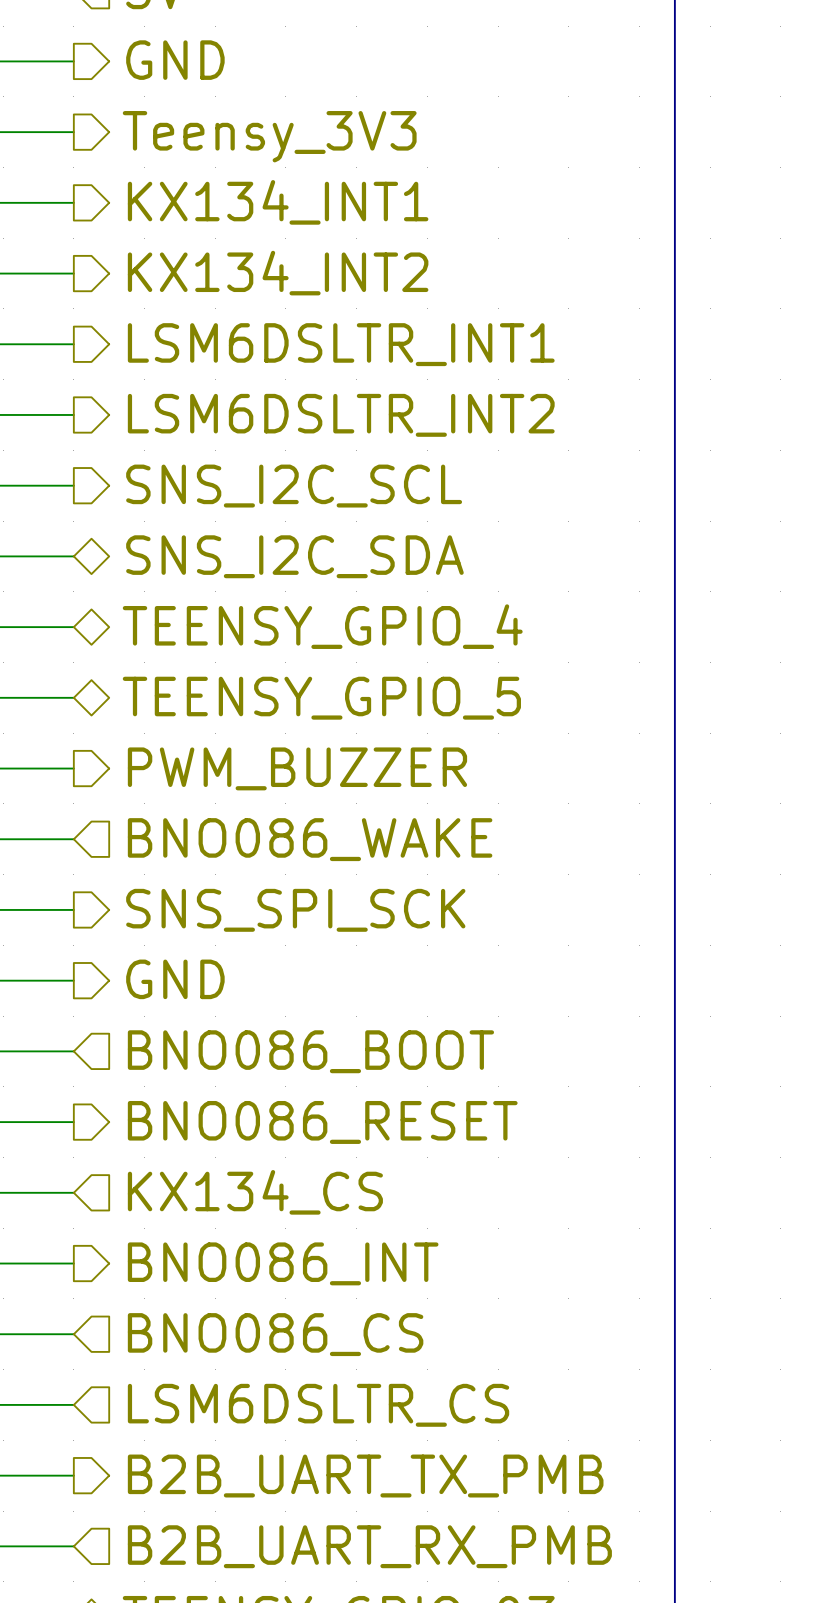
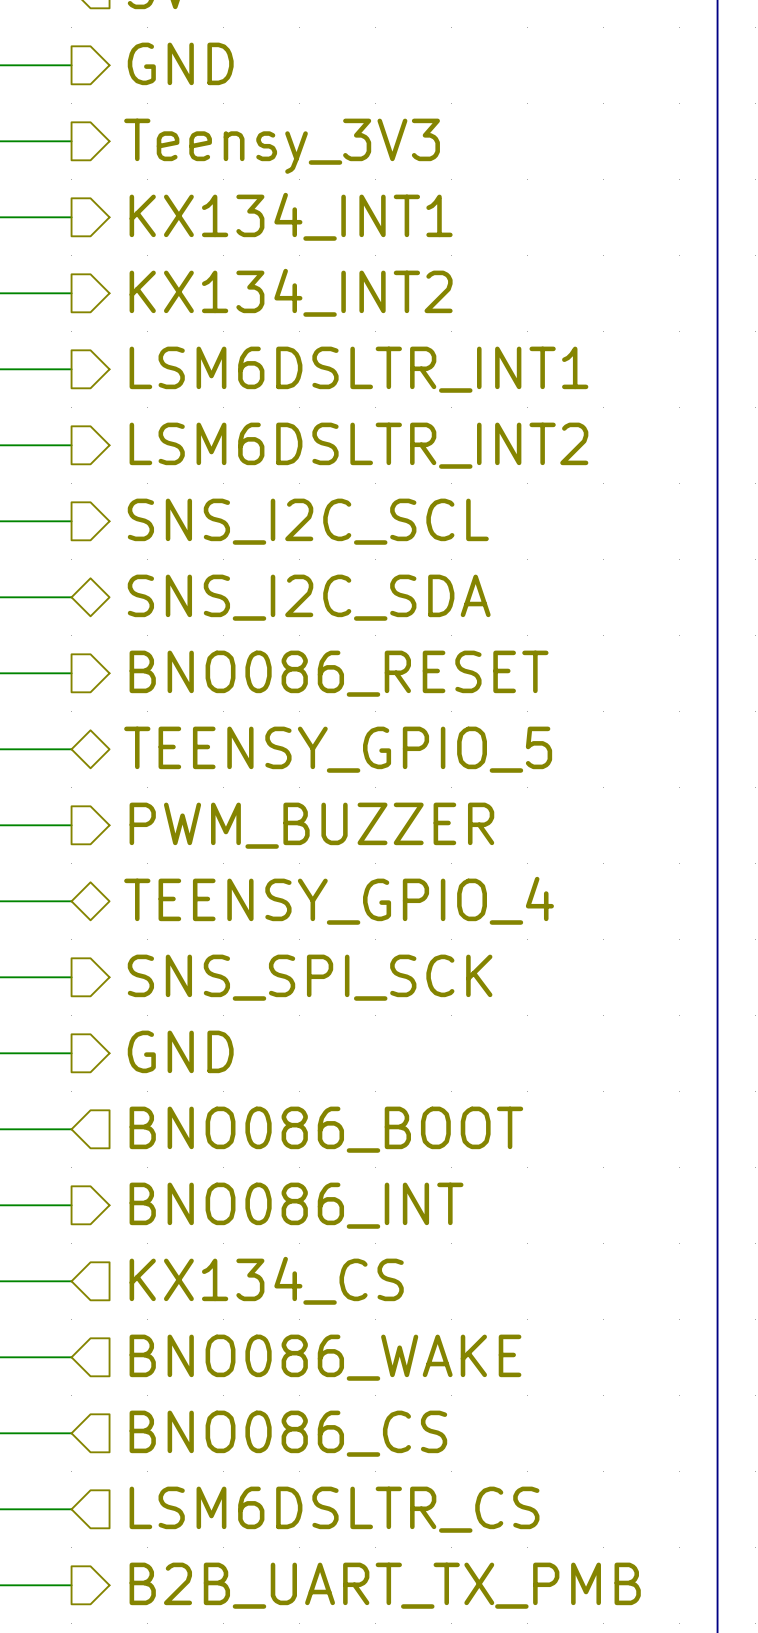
hierarchical label shape: bidirectional (322, 626) -> output (339, 673)
hierarchical label: TEENSY_GPIO_4 (322, 626) -> BNO086_RESET (339, 673)
hierarchical label shape: input (310, 839) -> bidirectional (339, 900)
hierarchical label: BNO086_WAKE (310, 839) -> TEENSY_GPIO_4 (339, 900)
hierarchical label: BNO086_RESET (322, 1122) -> BNO086_INT (296, 1205)
hierarchical label shape: output (283, 1263) -> input (325, 1357)
hierarchical label: BNO086_INT (283, 1263) -> BNO086_WAKE (325, 1357)

